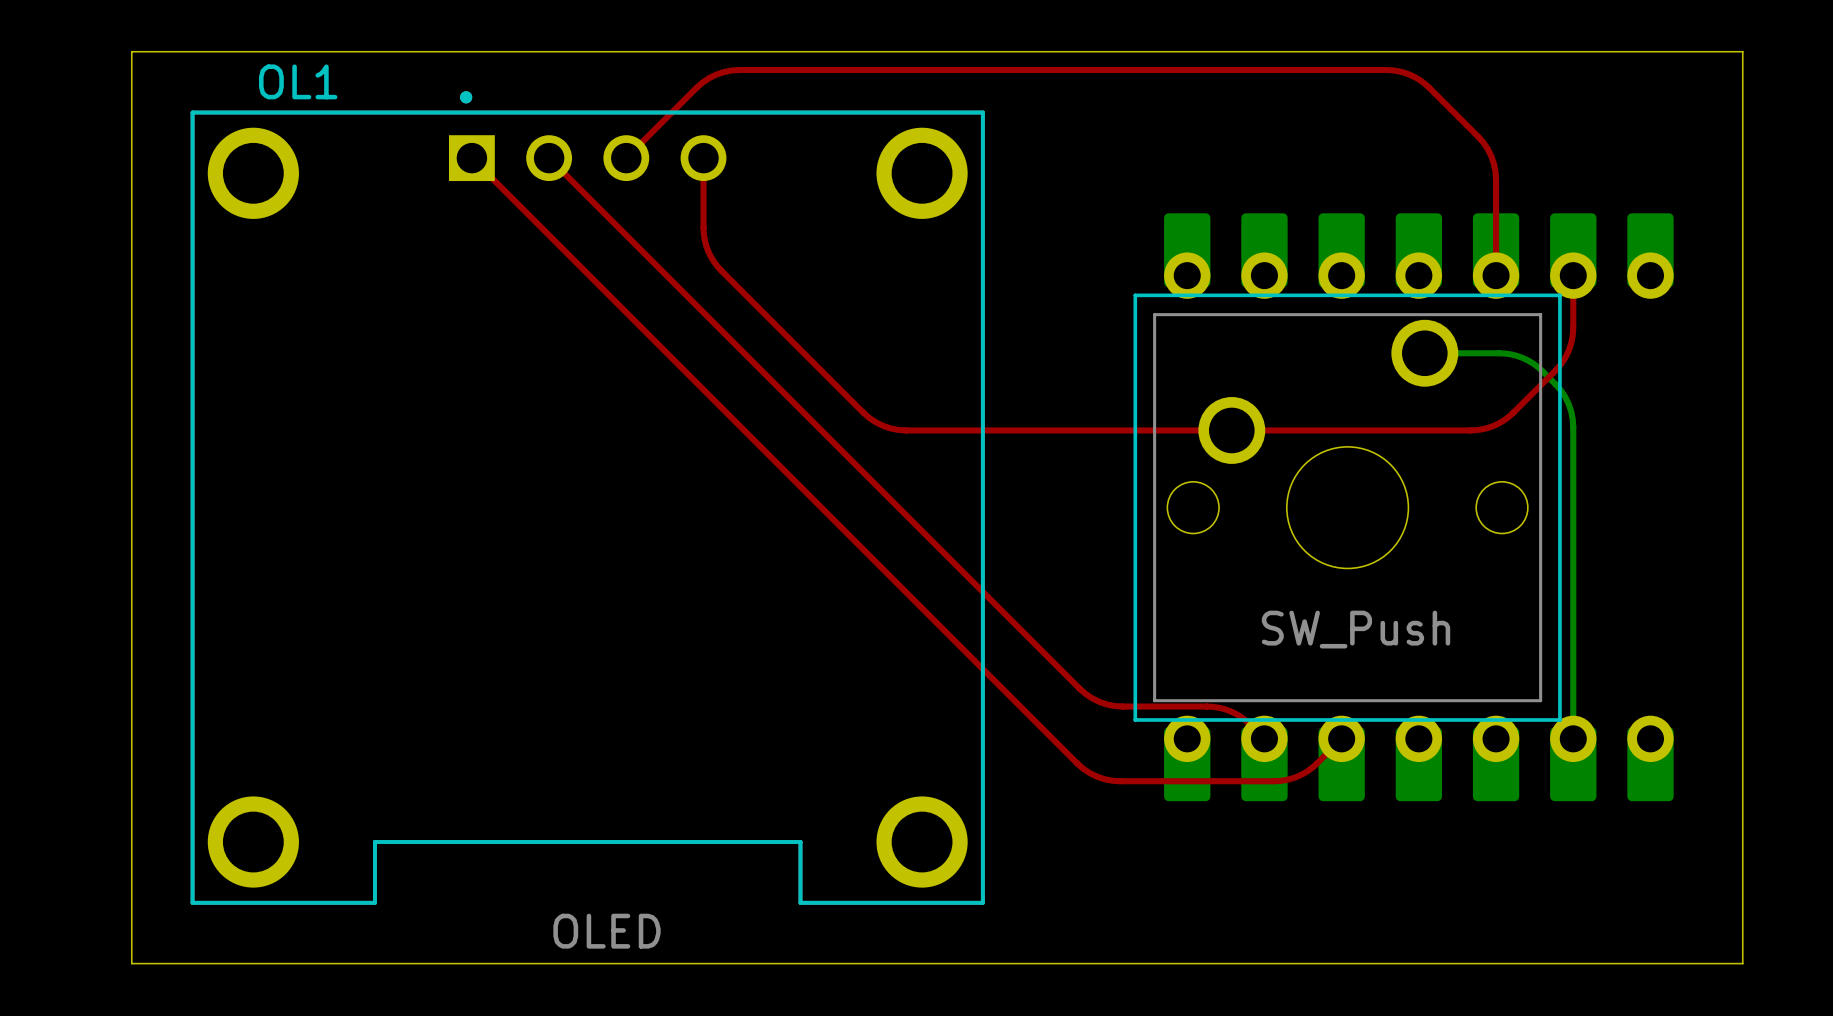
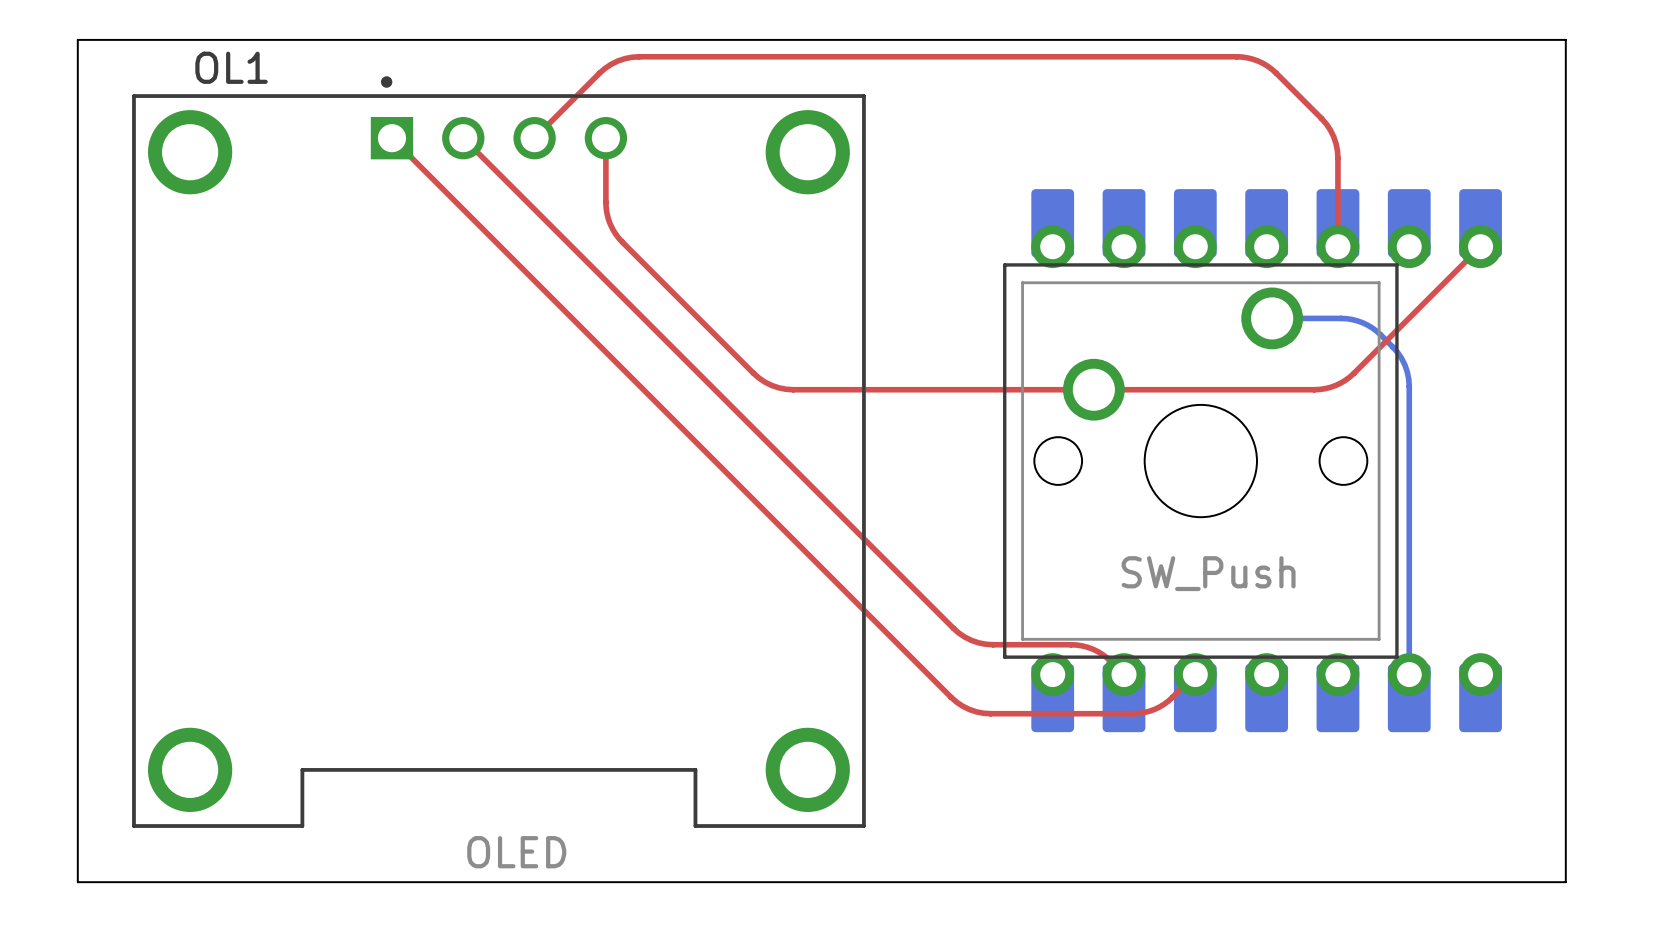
top track: (1573, 275) (1572, 335) (1568, 350) (1555, 370) -> (1480, 246) (1392, 334)

